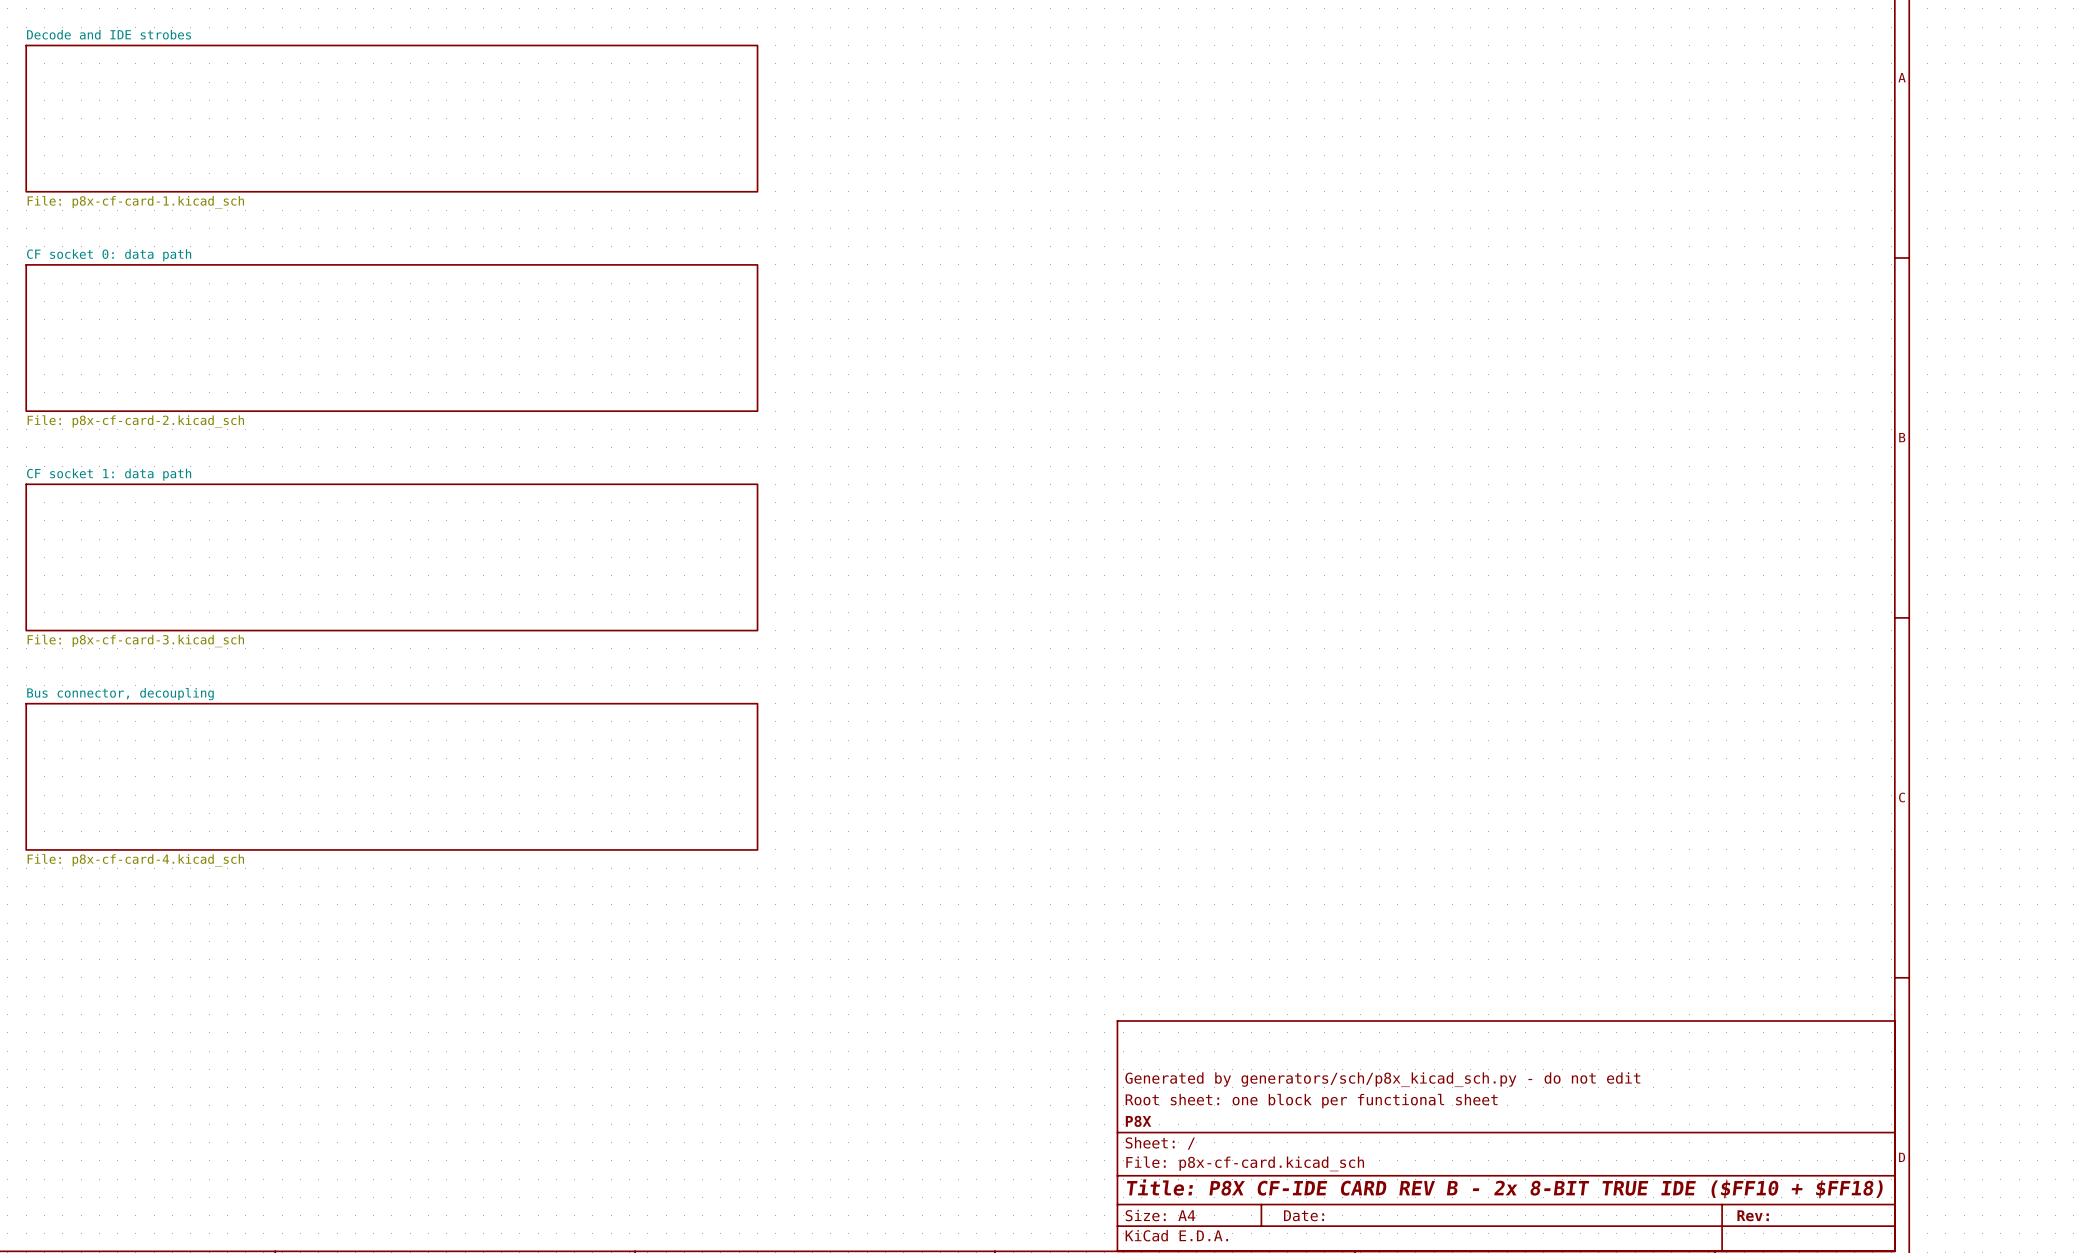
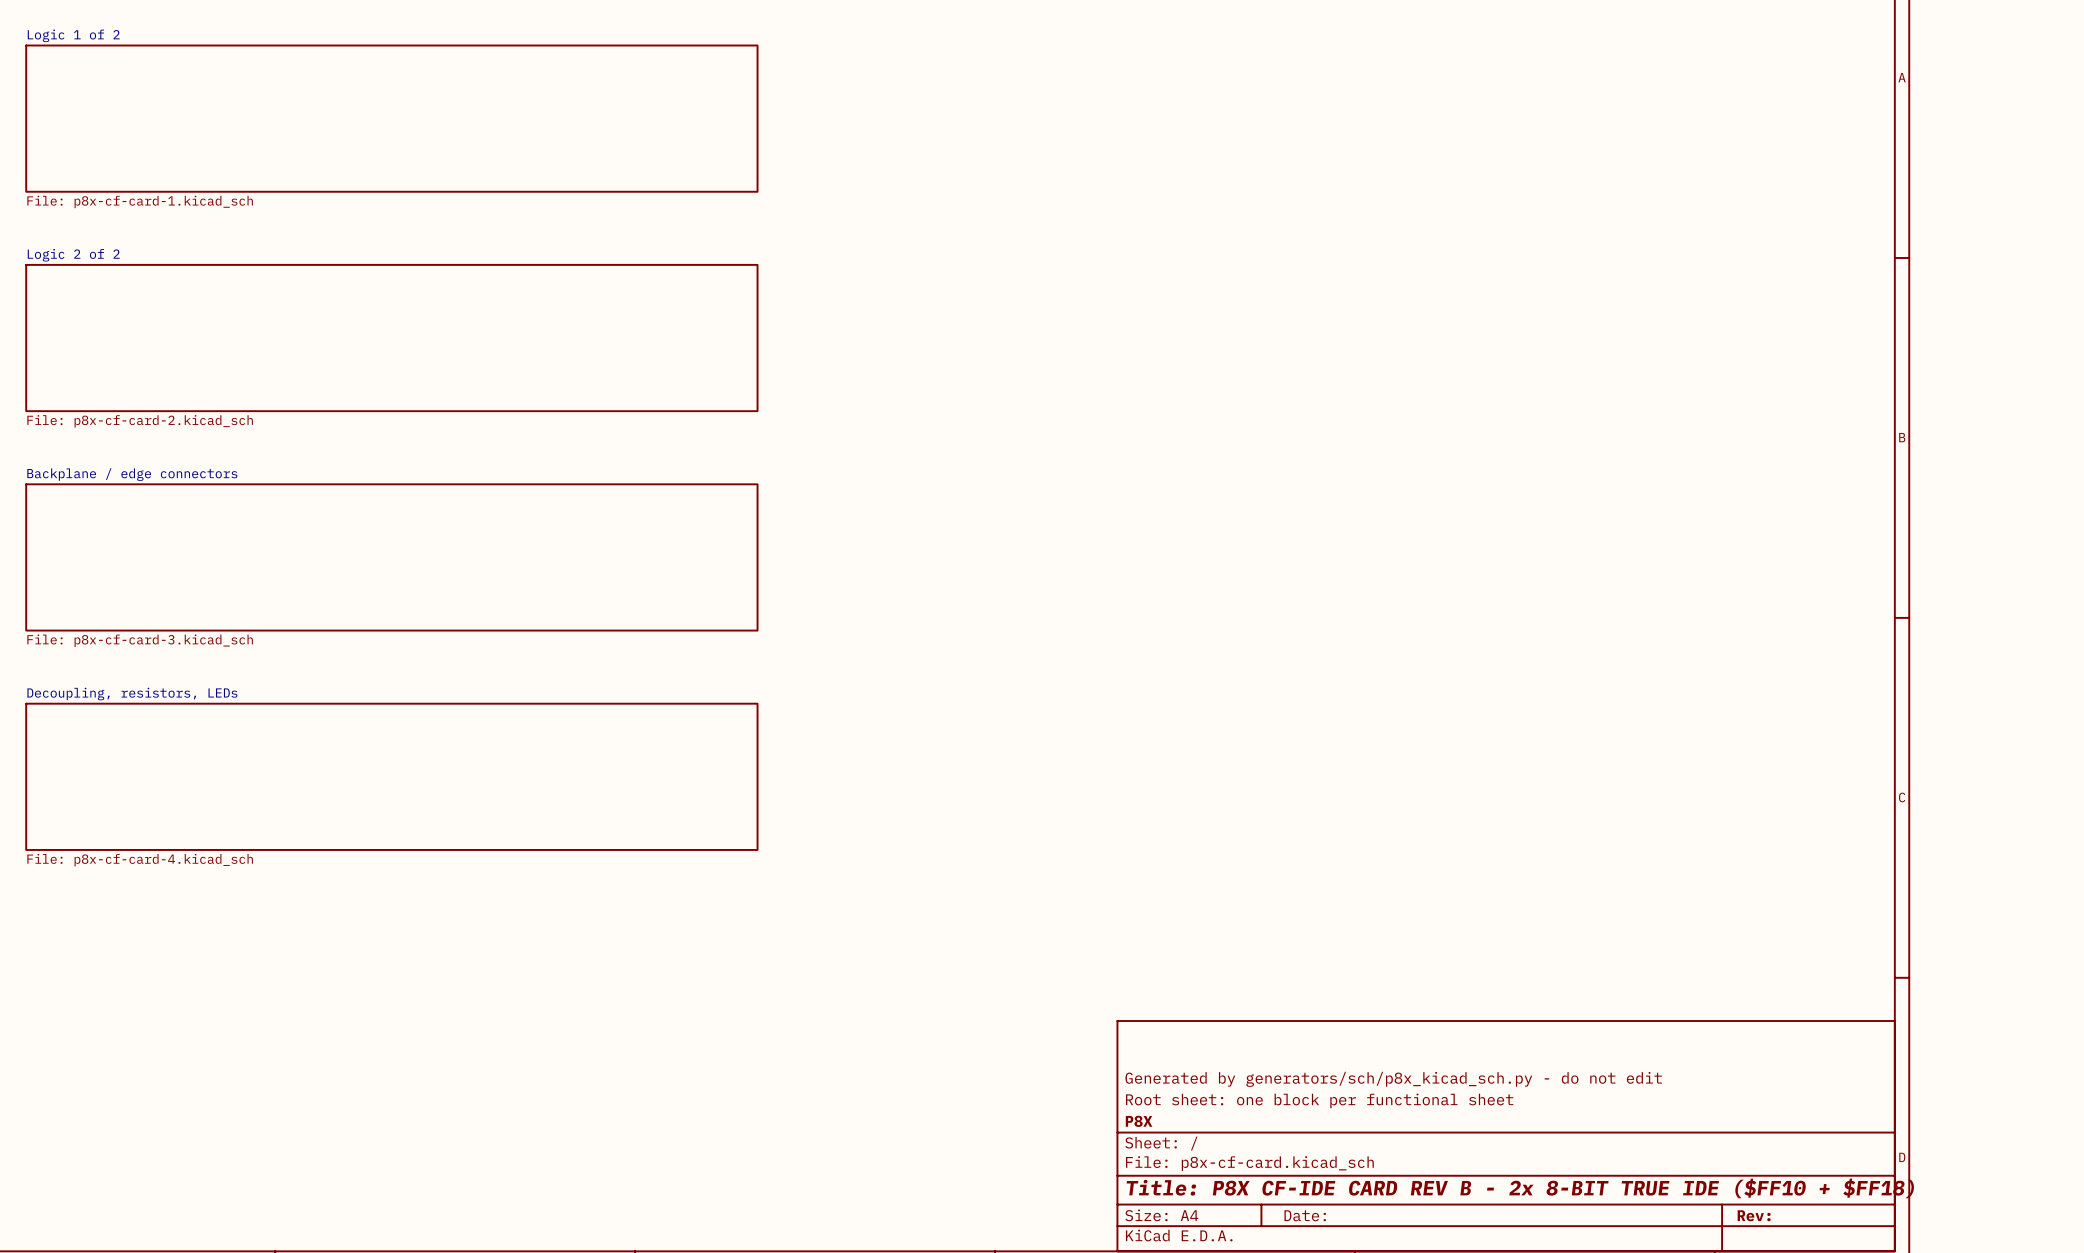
sheet Decode and IDE strobes name: Decode and IDE strobes (109, 34) -> Logic 1 of 2 (73, 35)
sheet Logic 2 of 2 name: CF socket 0: data path (109, 255) -> Logic 2 of 2 (73, 255)
sheet Backplane / edge connectors name: CF socket 1: data path (109, 474) -> Backplane / edge connectors (132, 474)
sheet Bus connector, decoupling name: Bus connector, decoupling (120, 694) -> Decoupling, resistors, LEDs (132, 694)

